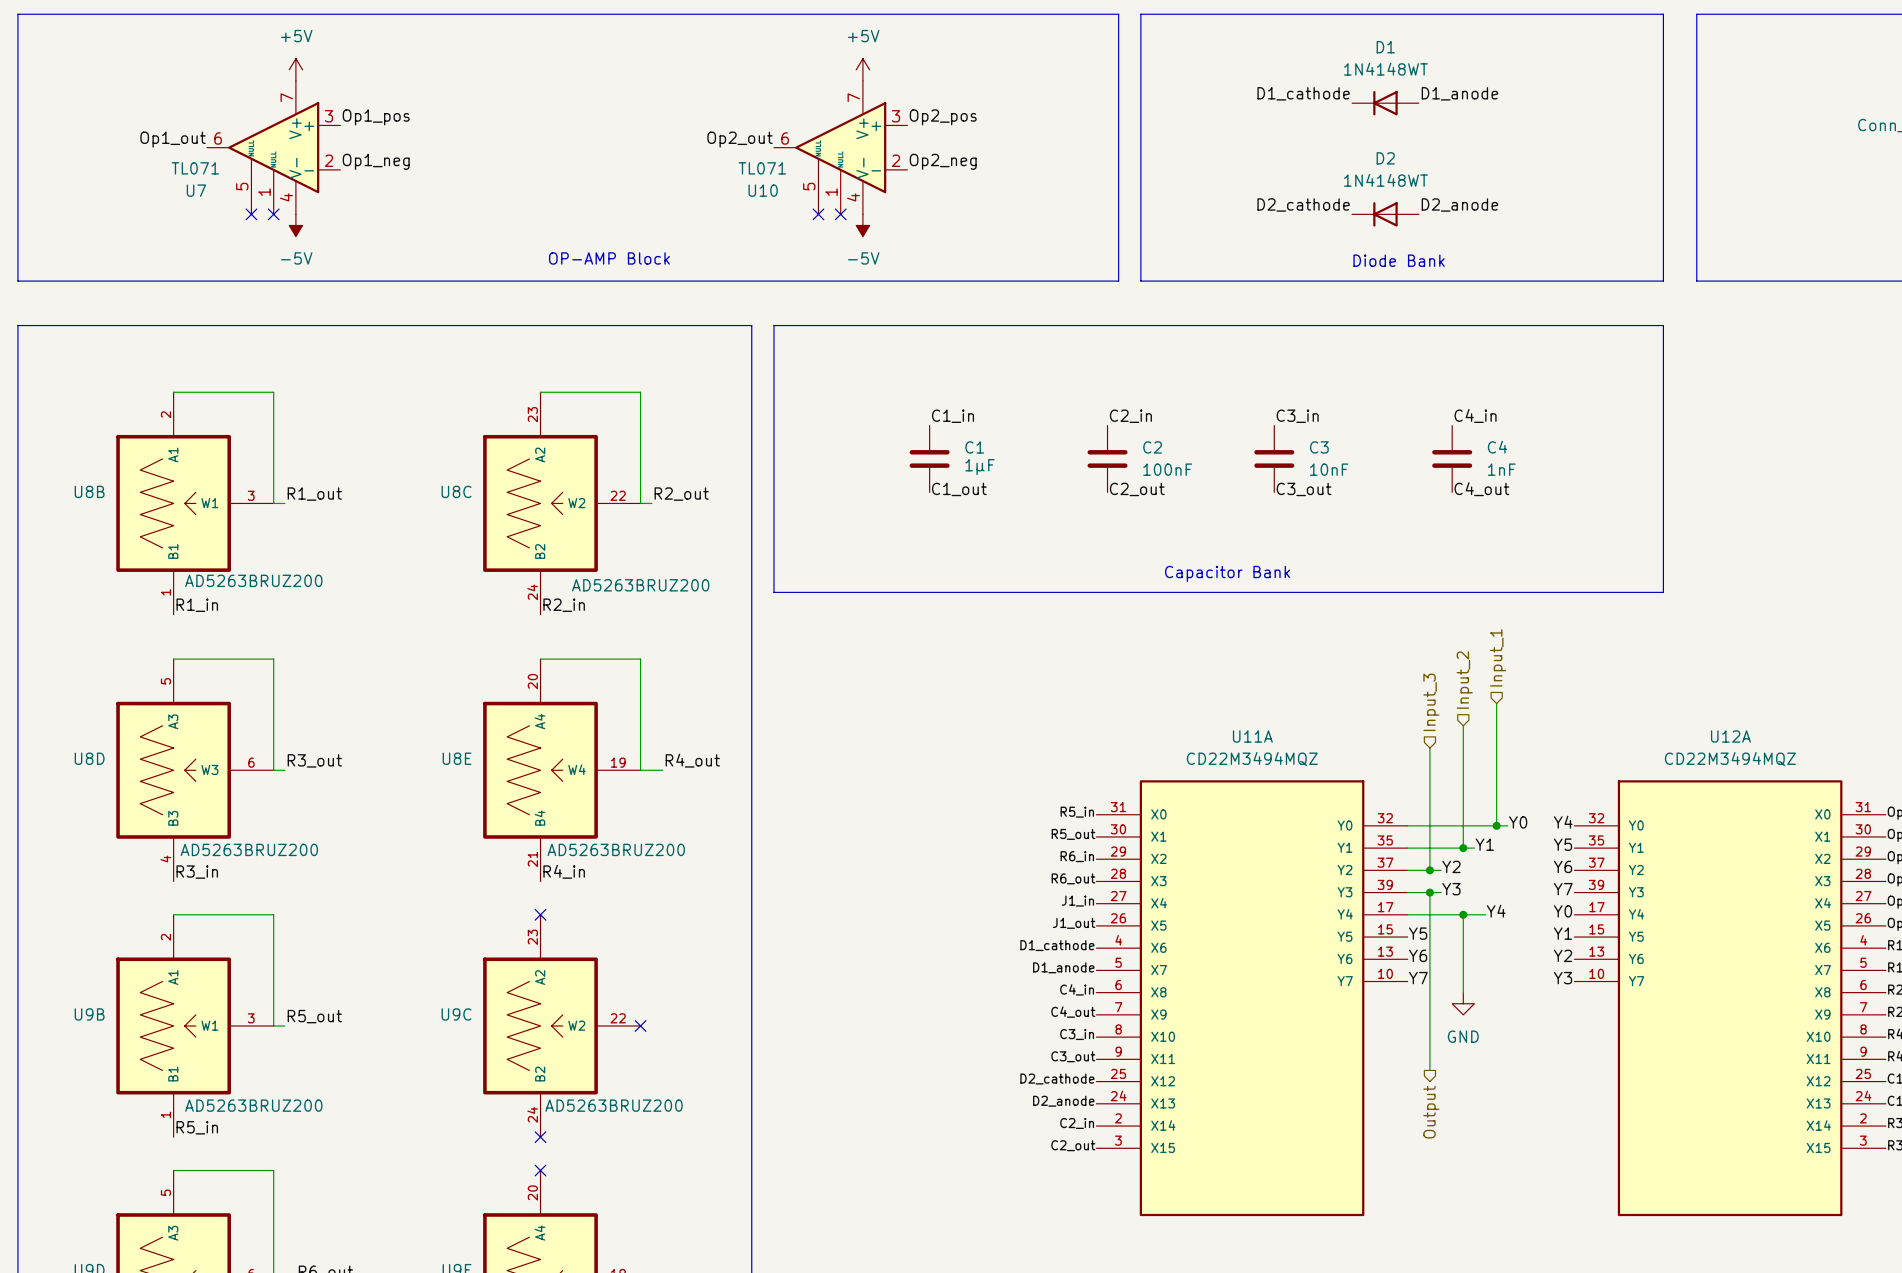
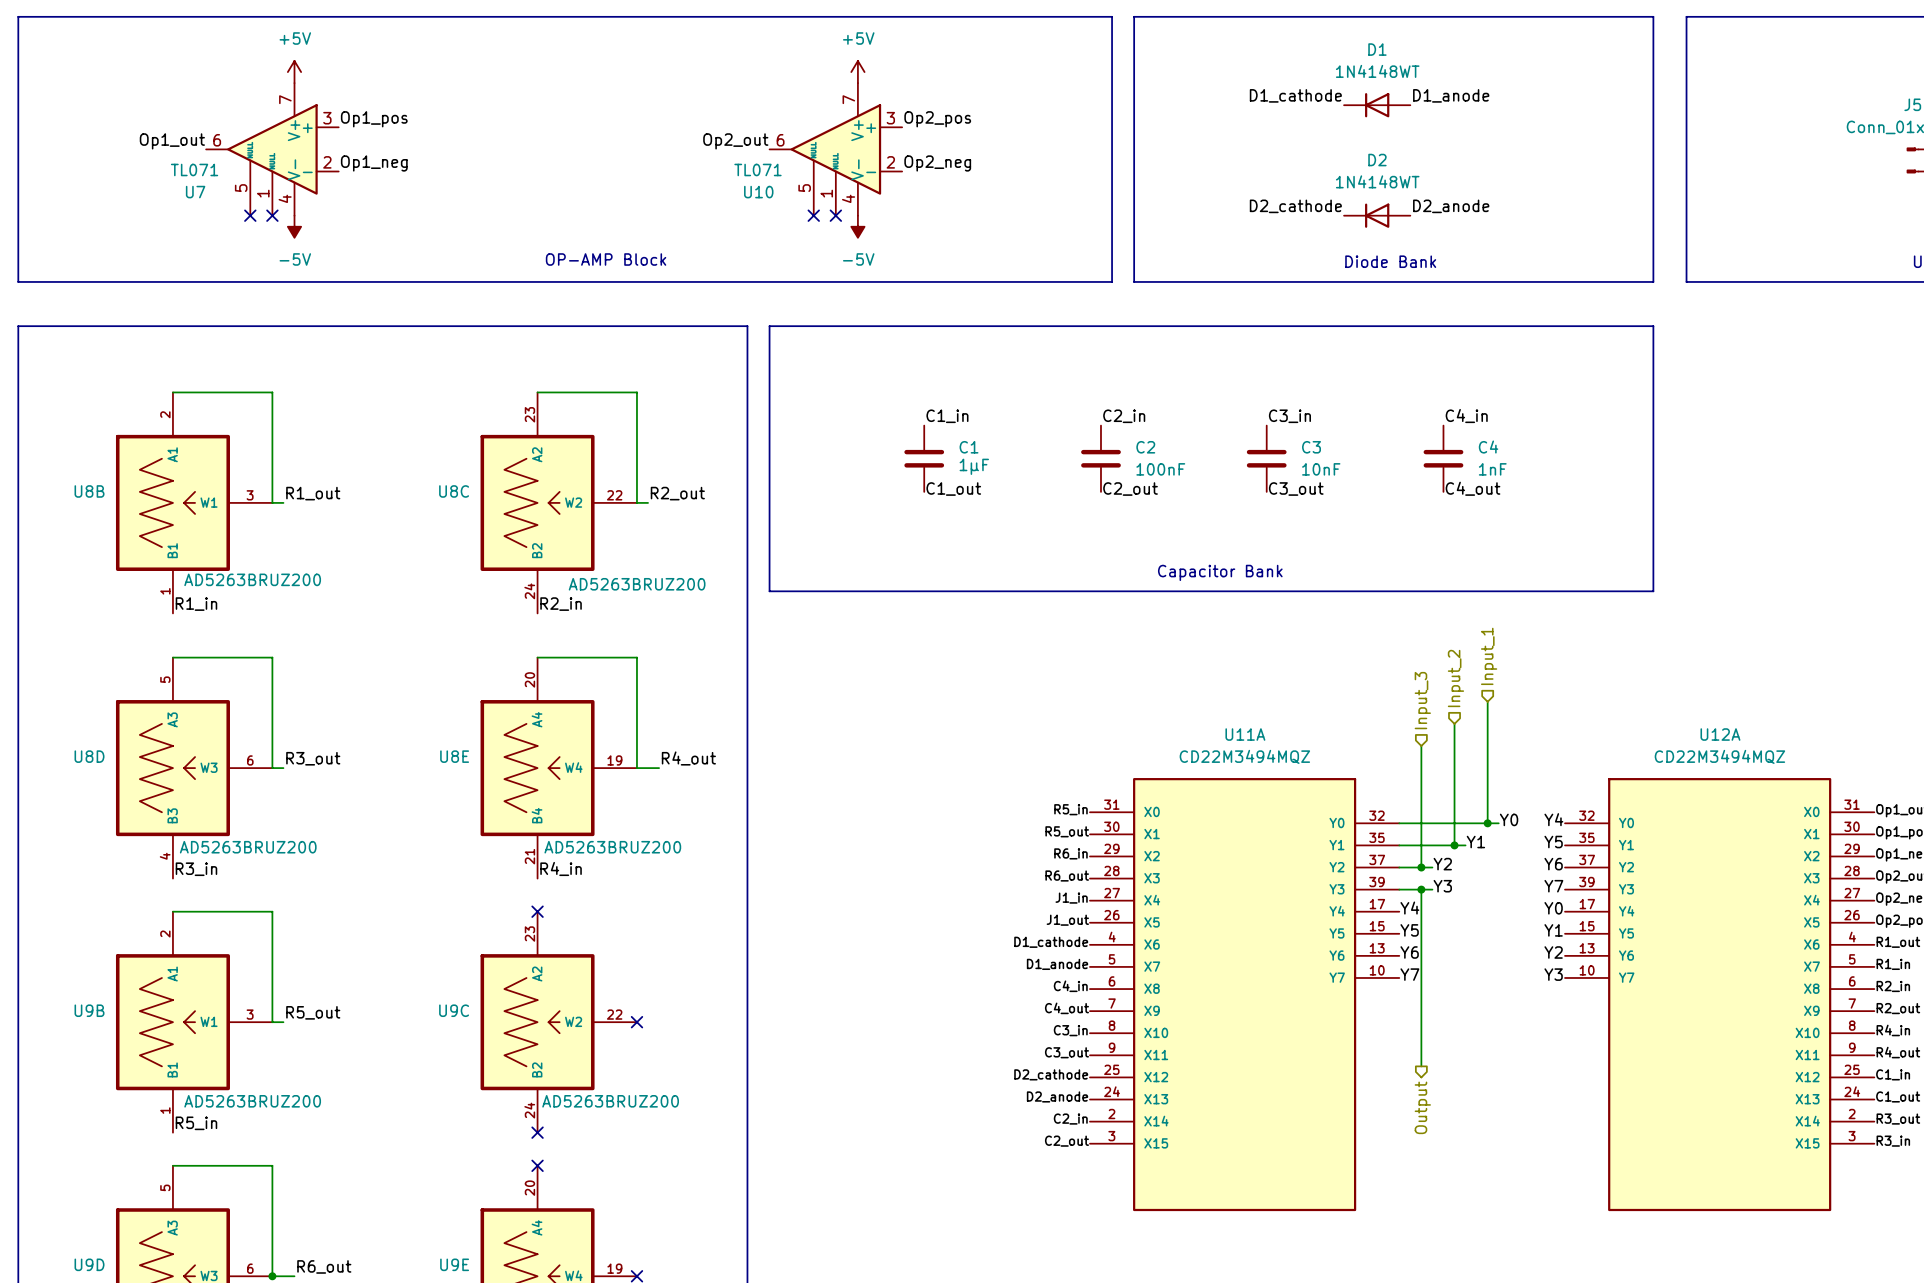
label position: Y4 (1496, 911) -> Y4 (1409, 908)
wire: (1407, 914) (1485, 914) -> none
wire: (1463, 914) (1463, 992) -> none
junction: (1463, 914) -> none
power symbol: GND (1463, 1003) -> none

